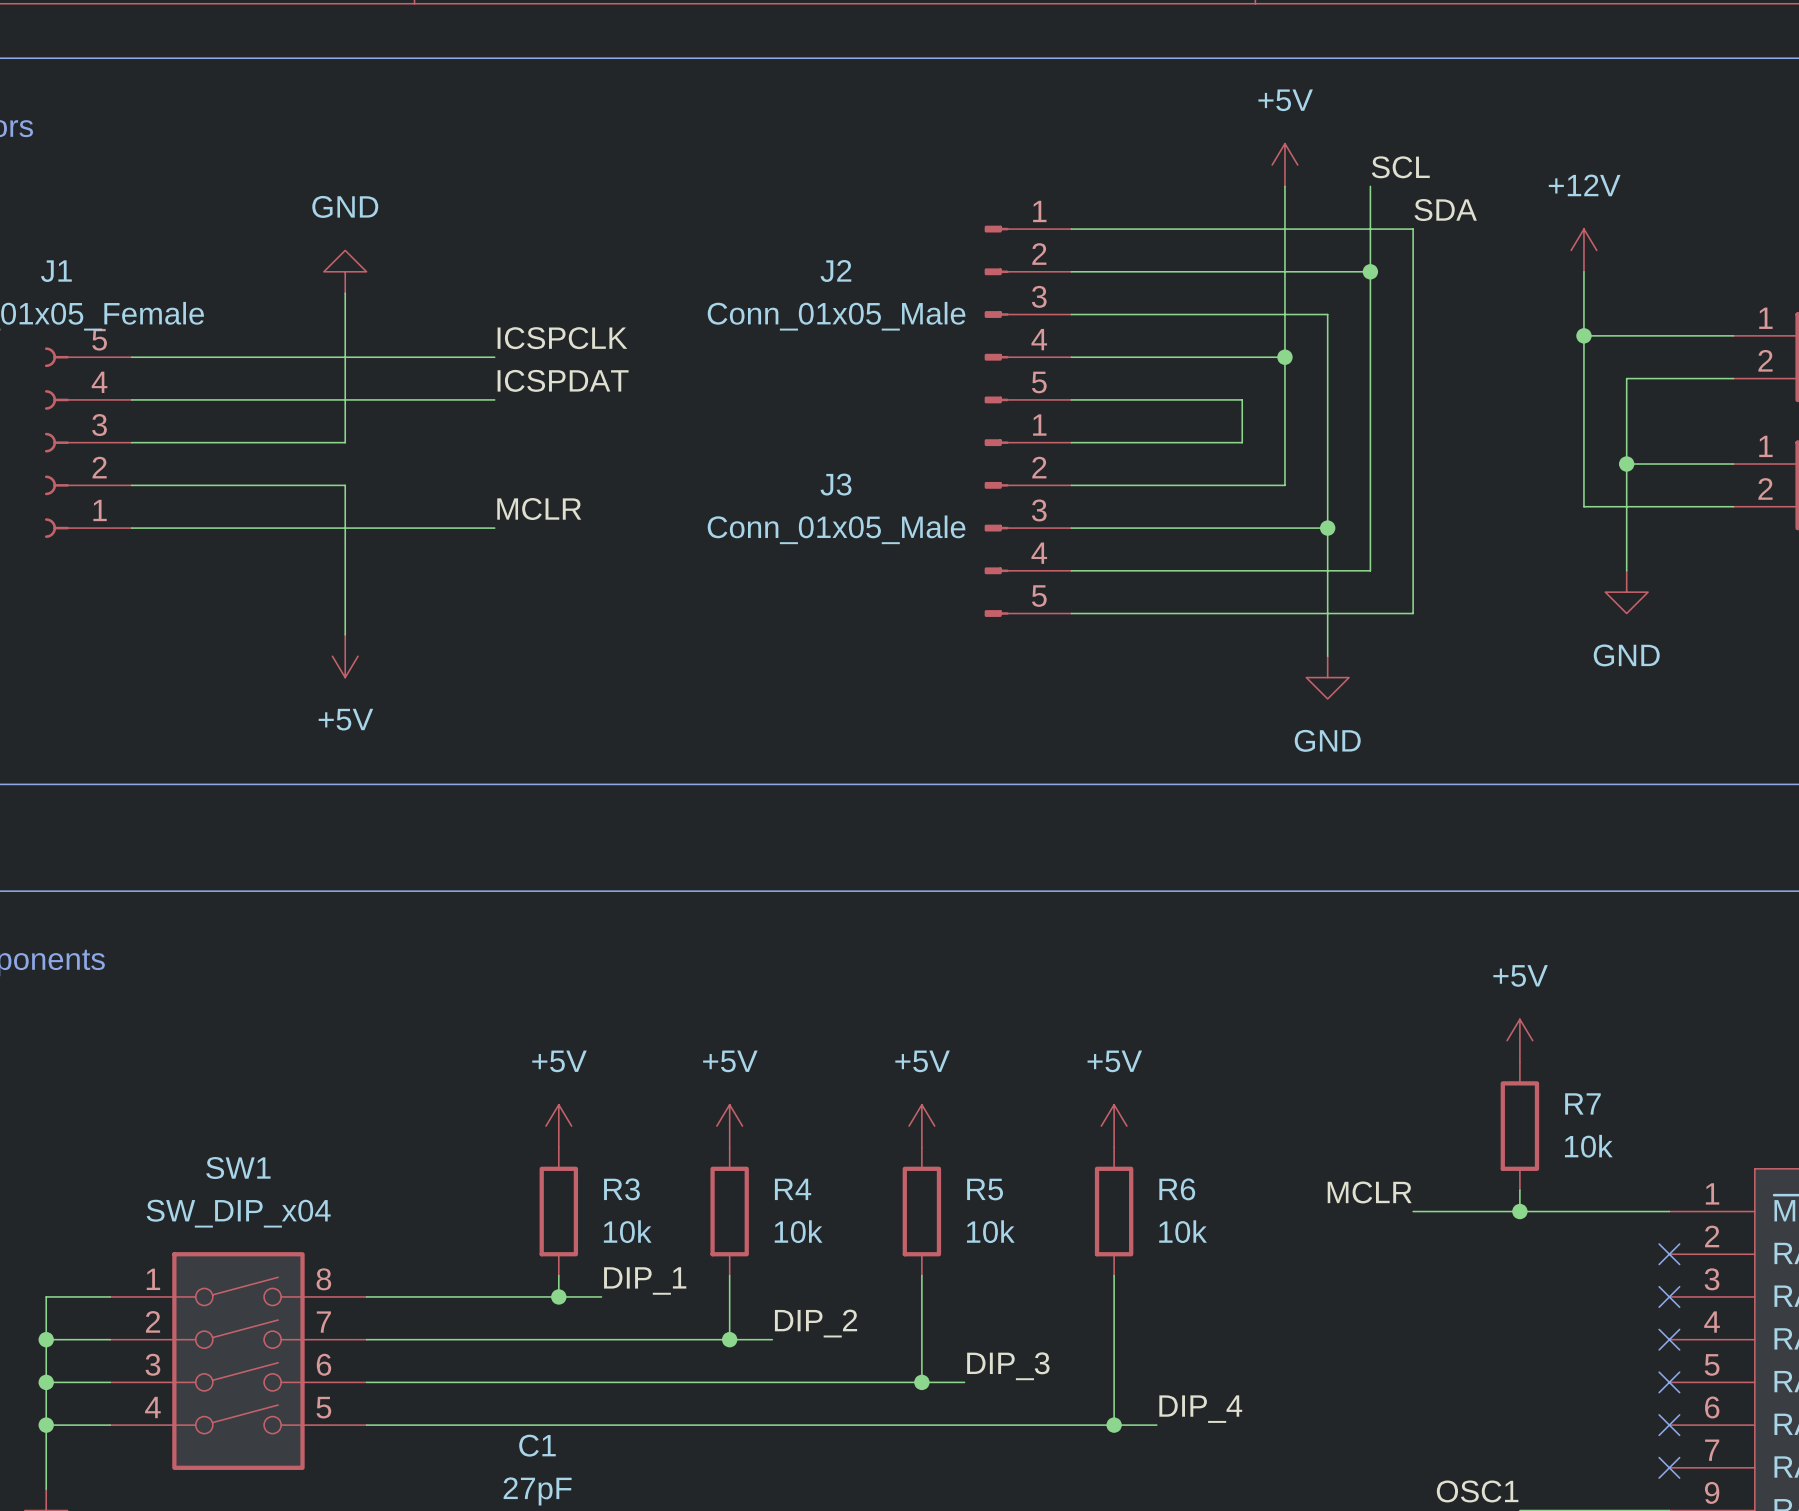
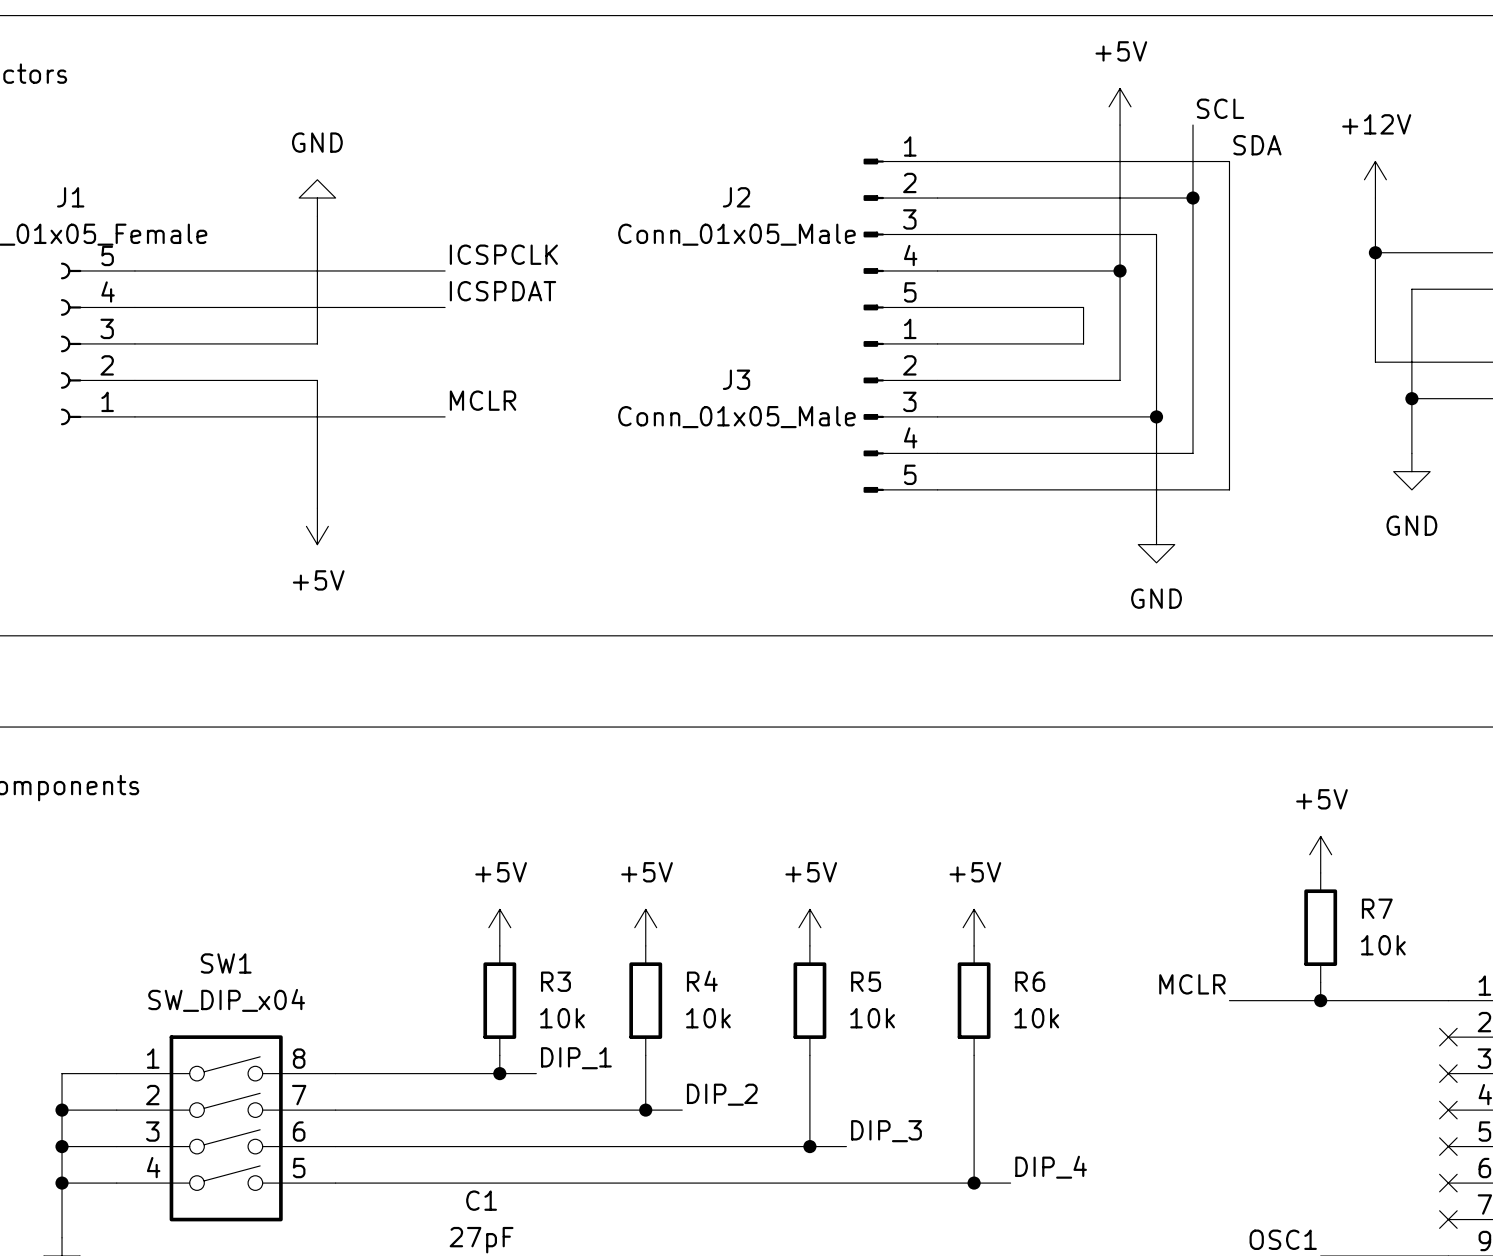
wire: (1583, 464) (1583, 506) (1626, 506) -> (1375, 362) (1411, 362)
junction position: (1626, 464) -> (1411, 398)

